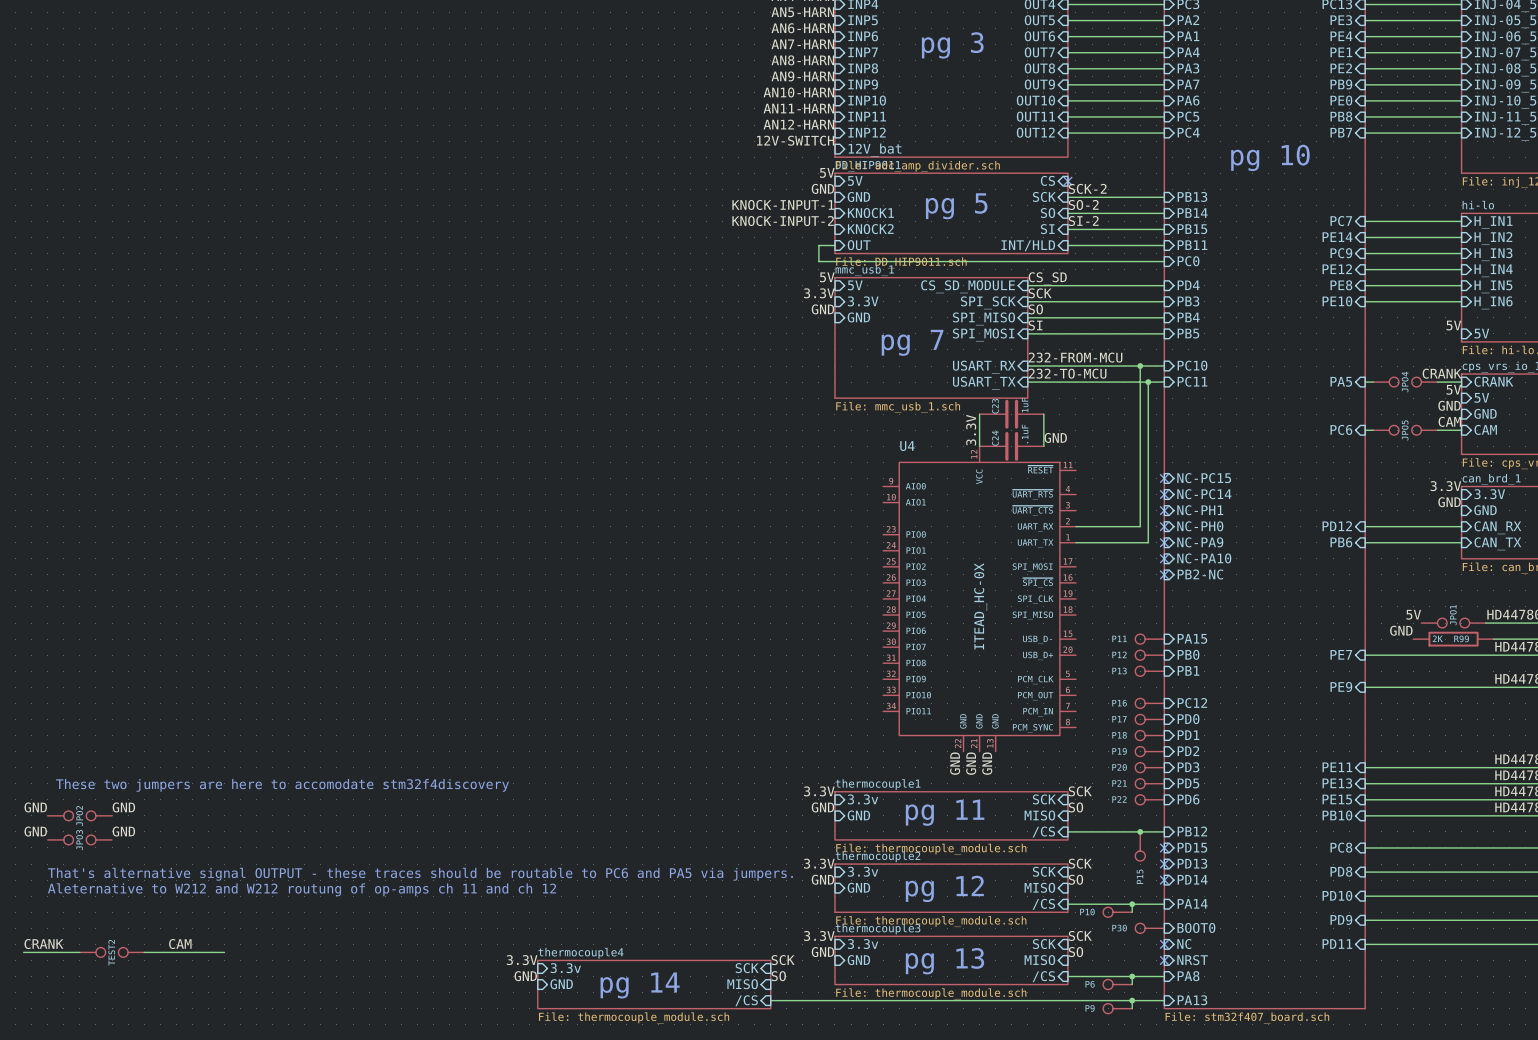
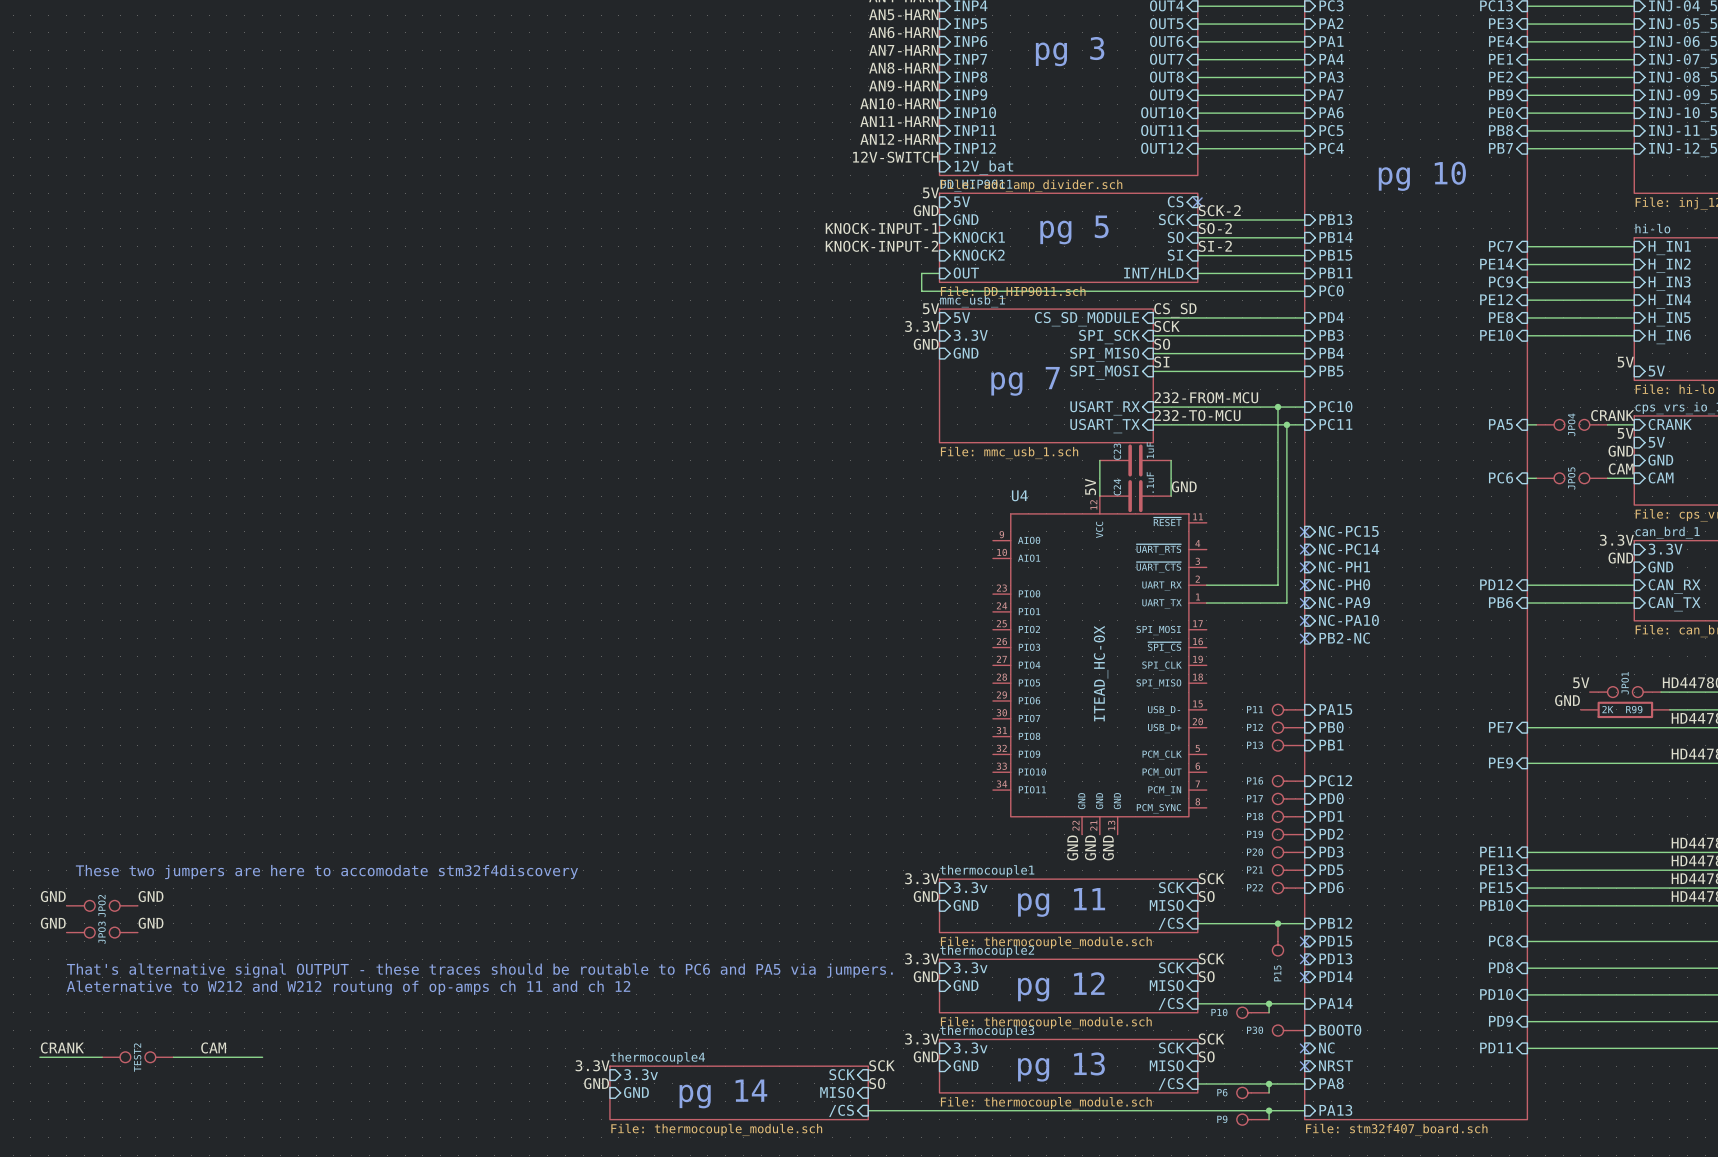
label: 3.3V (971, 430) -> 5V (1090, 486)

